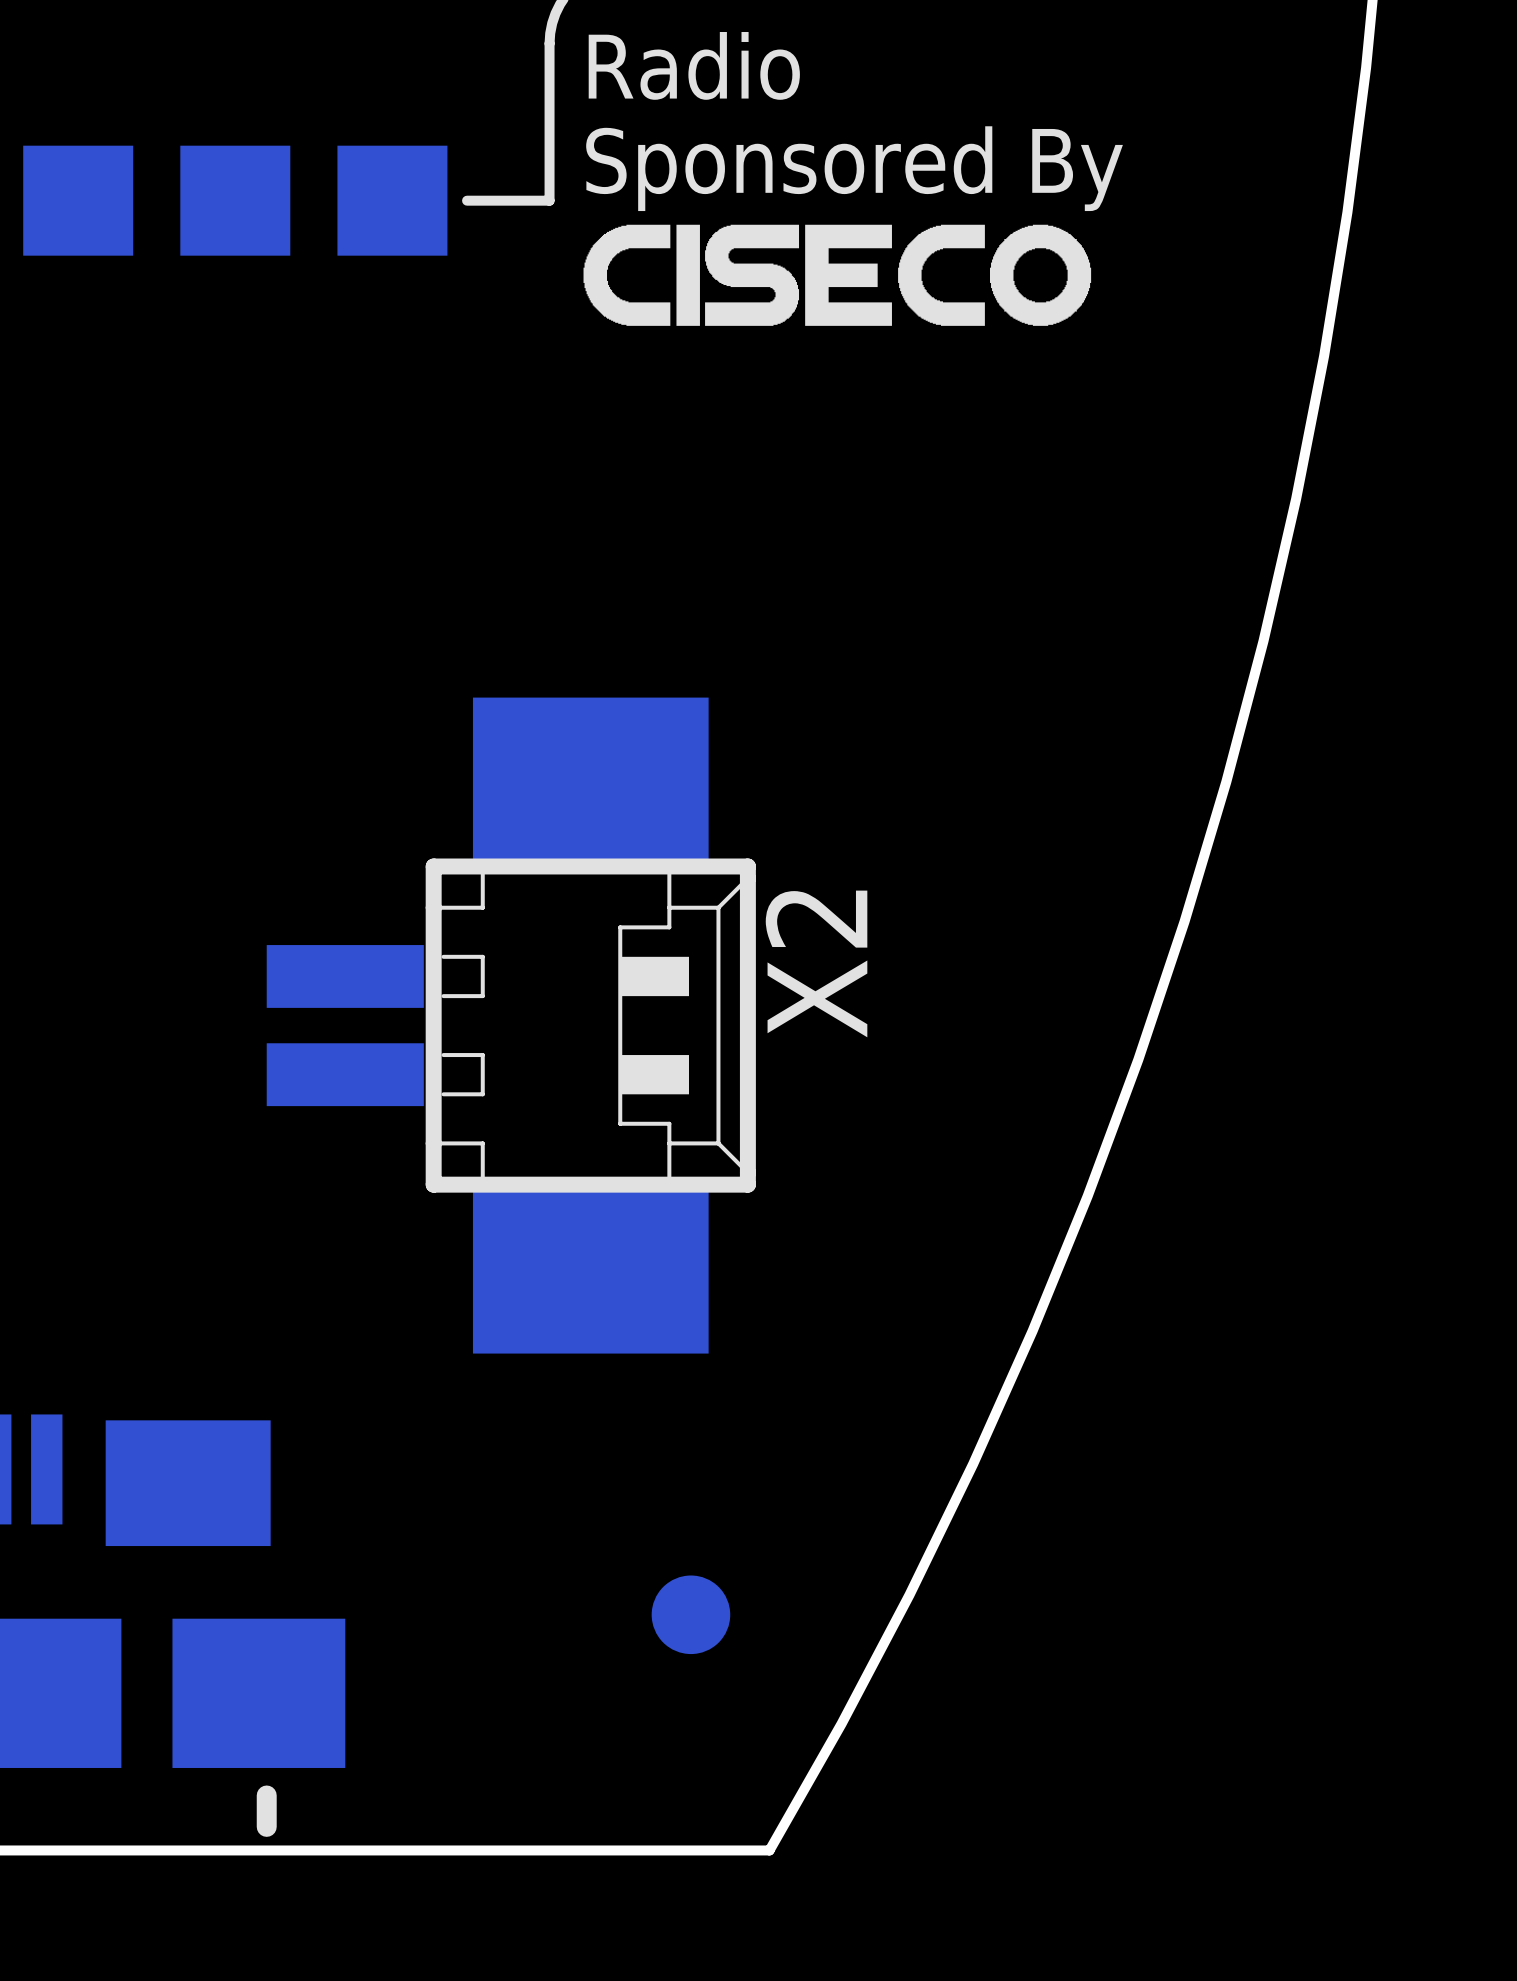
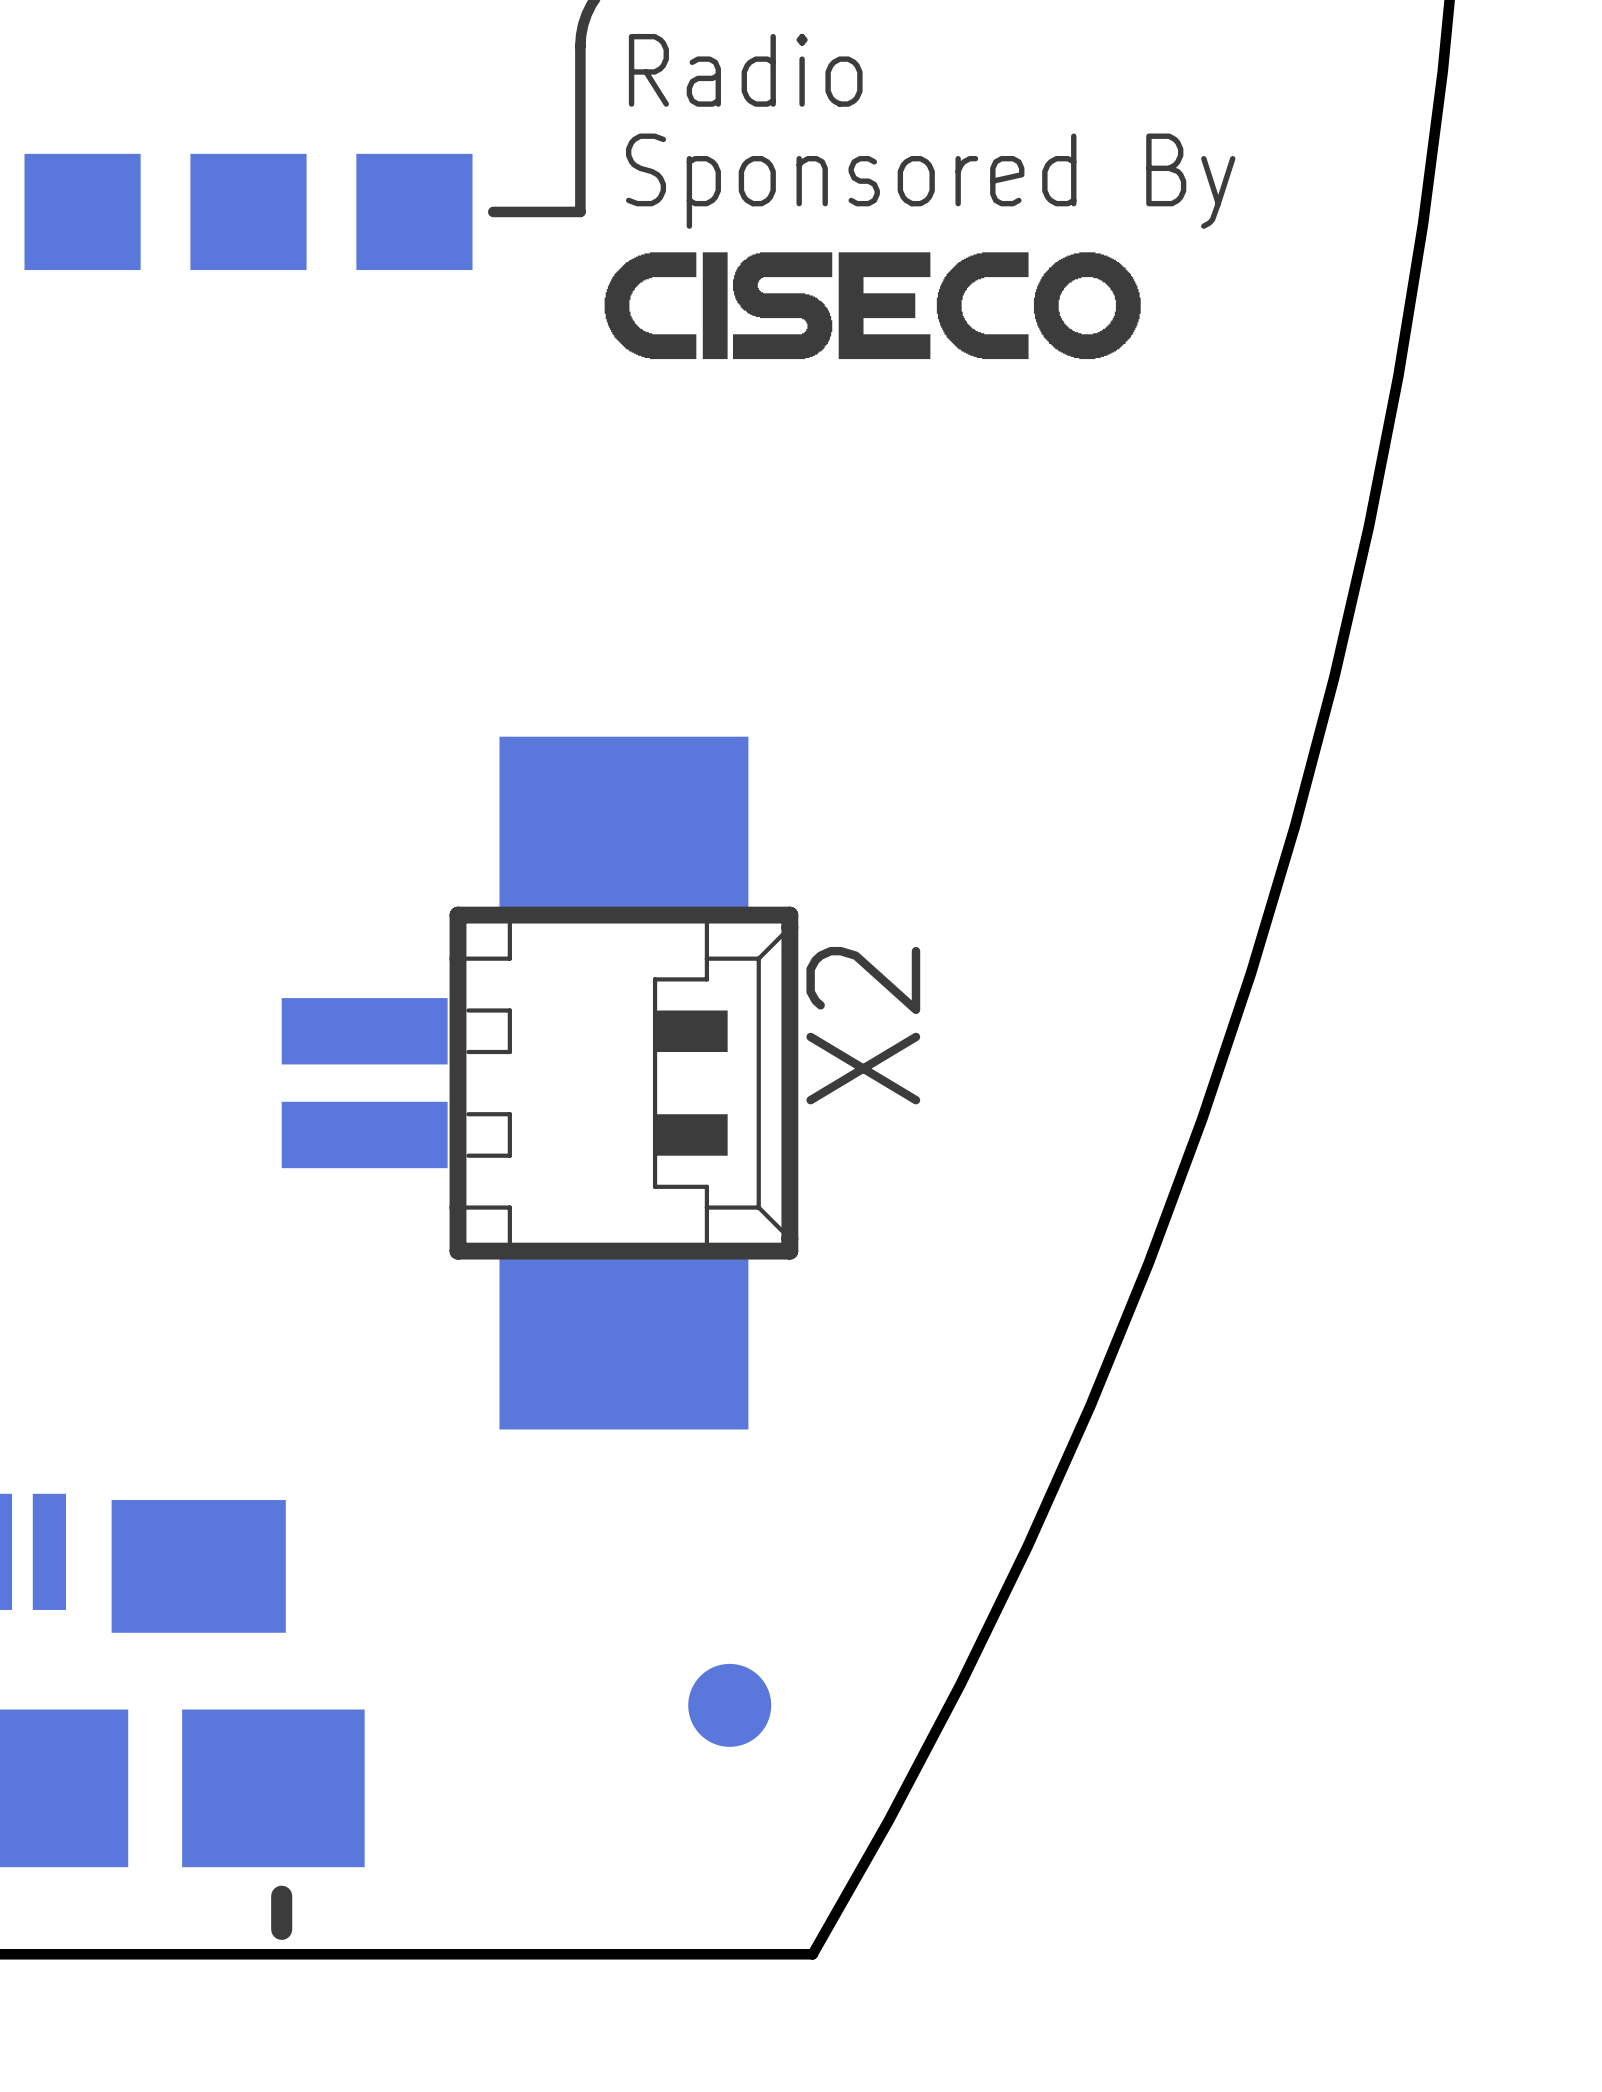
drawing position: (837, 275) -> (872, 305)

